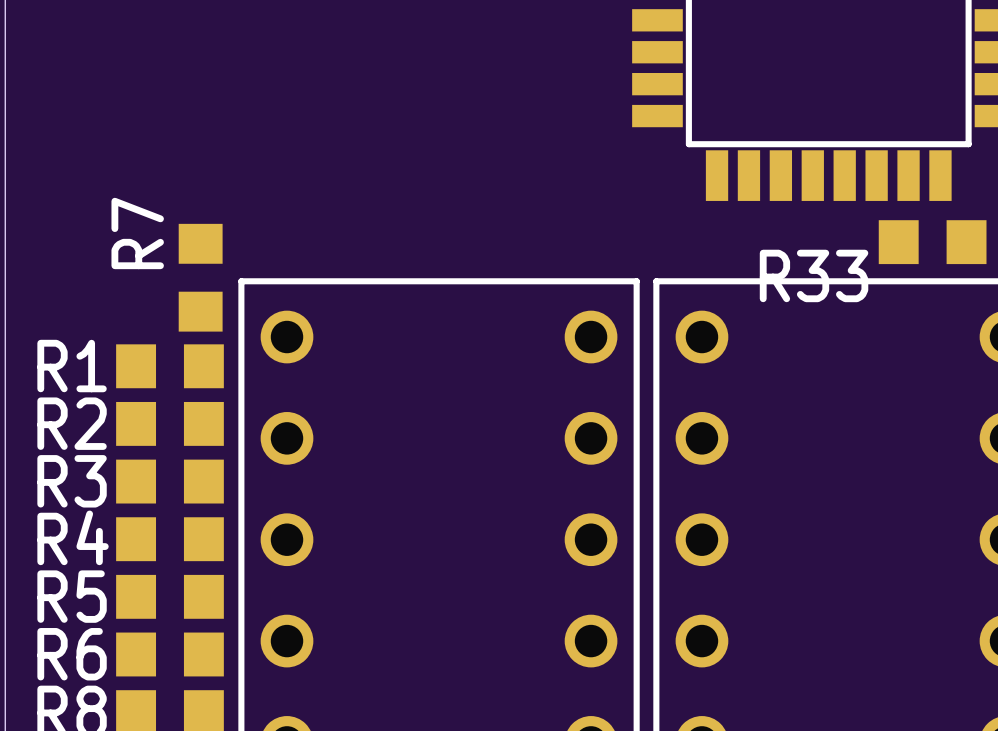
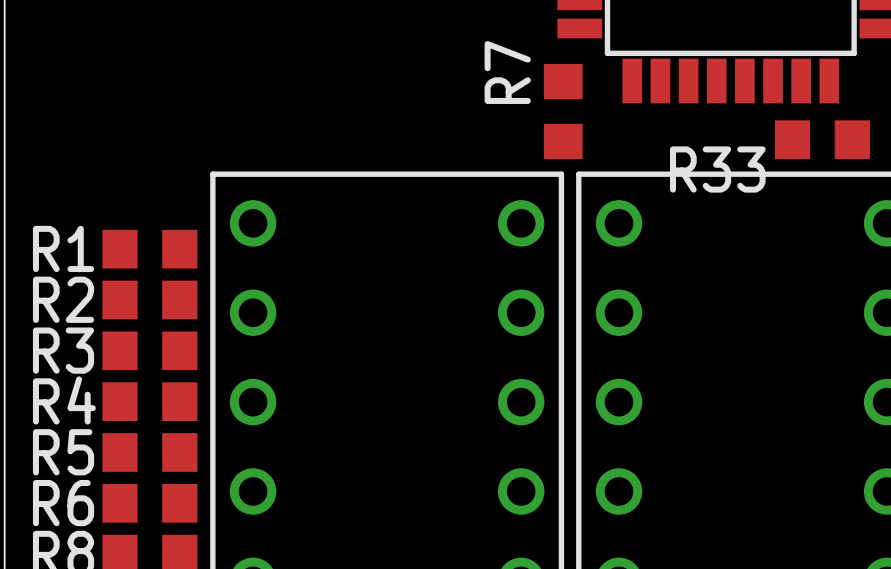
R7 position: (200, 277) -> (563, 111)

